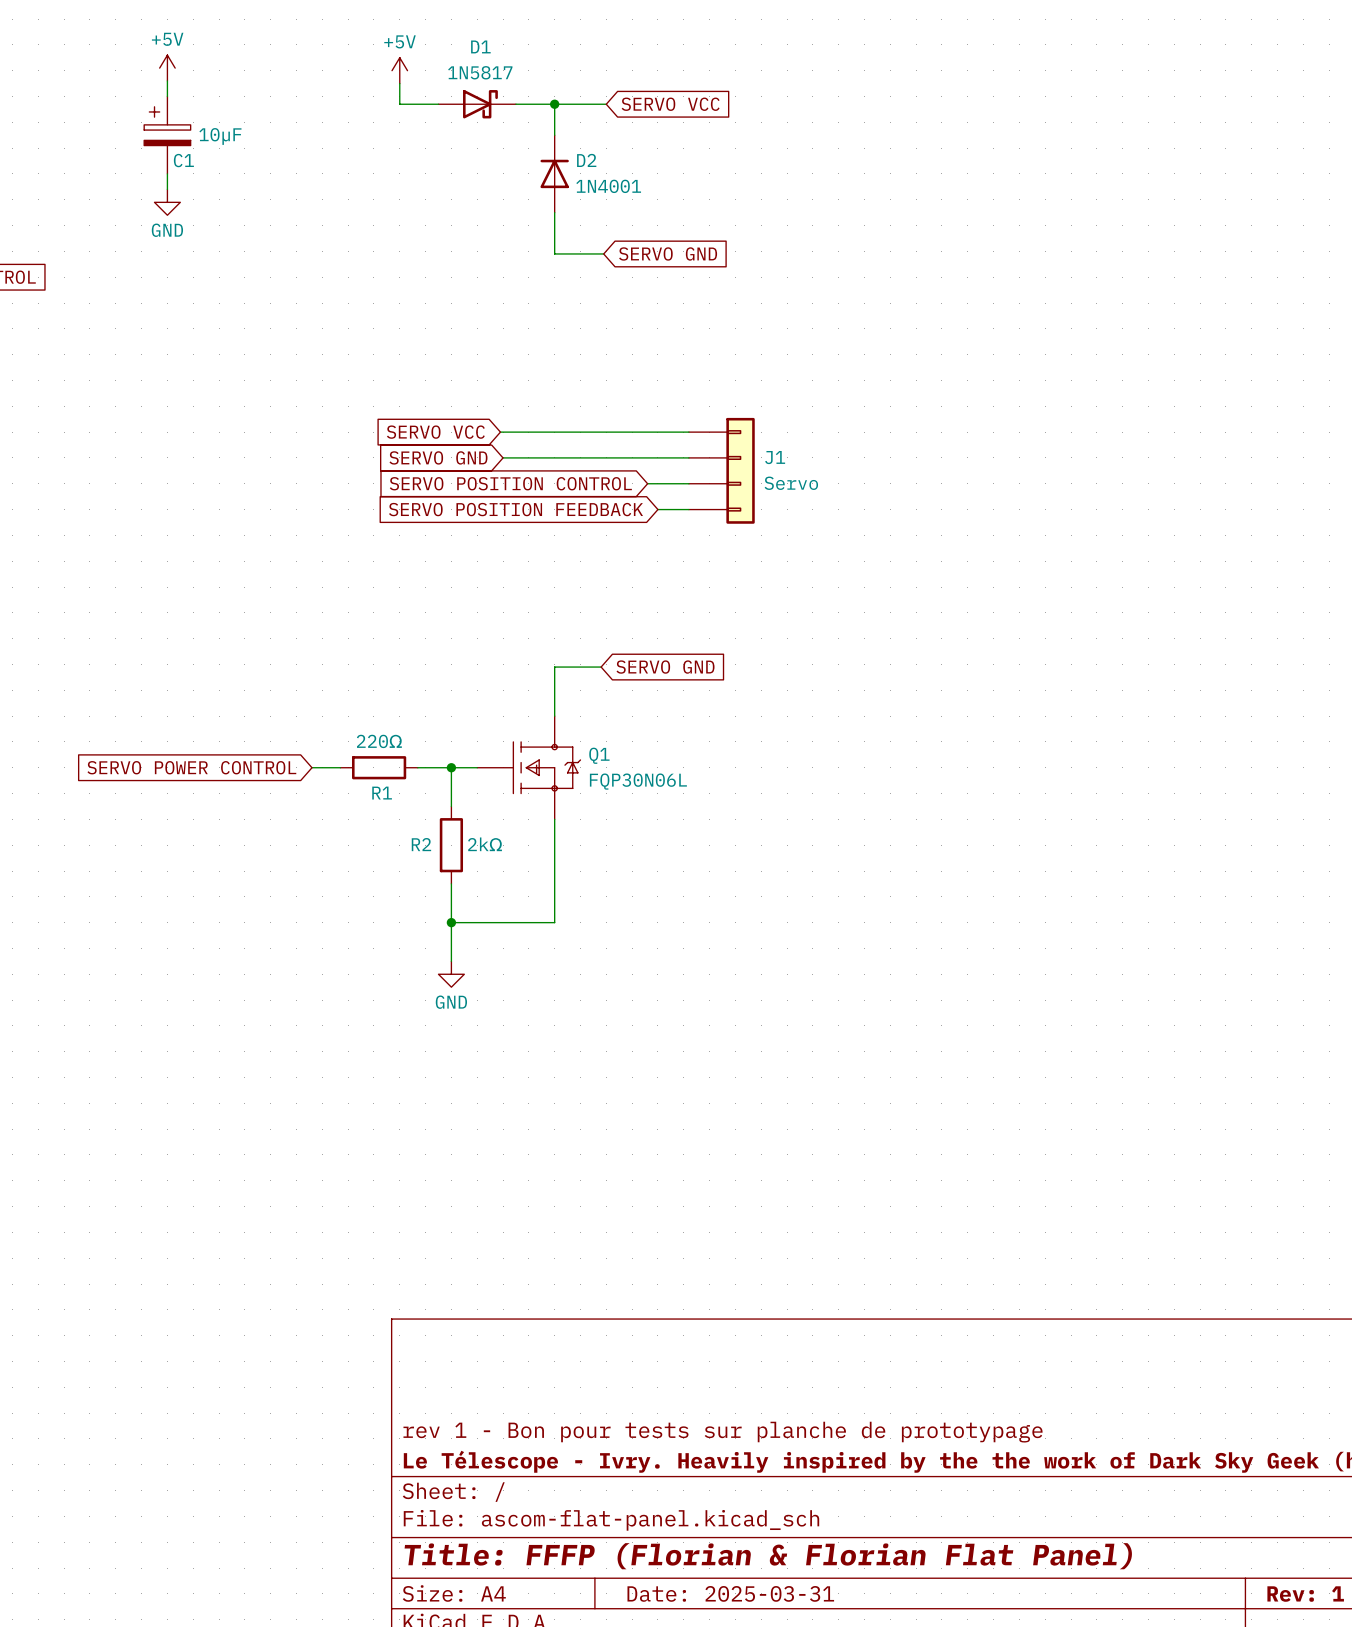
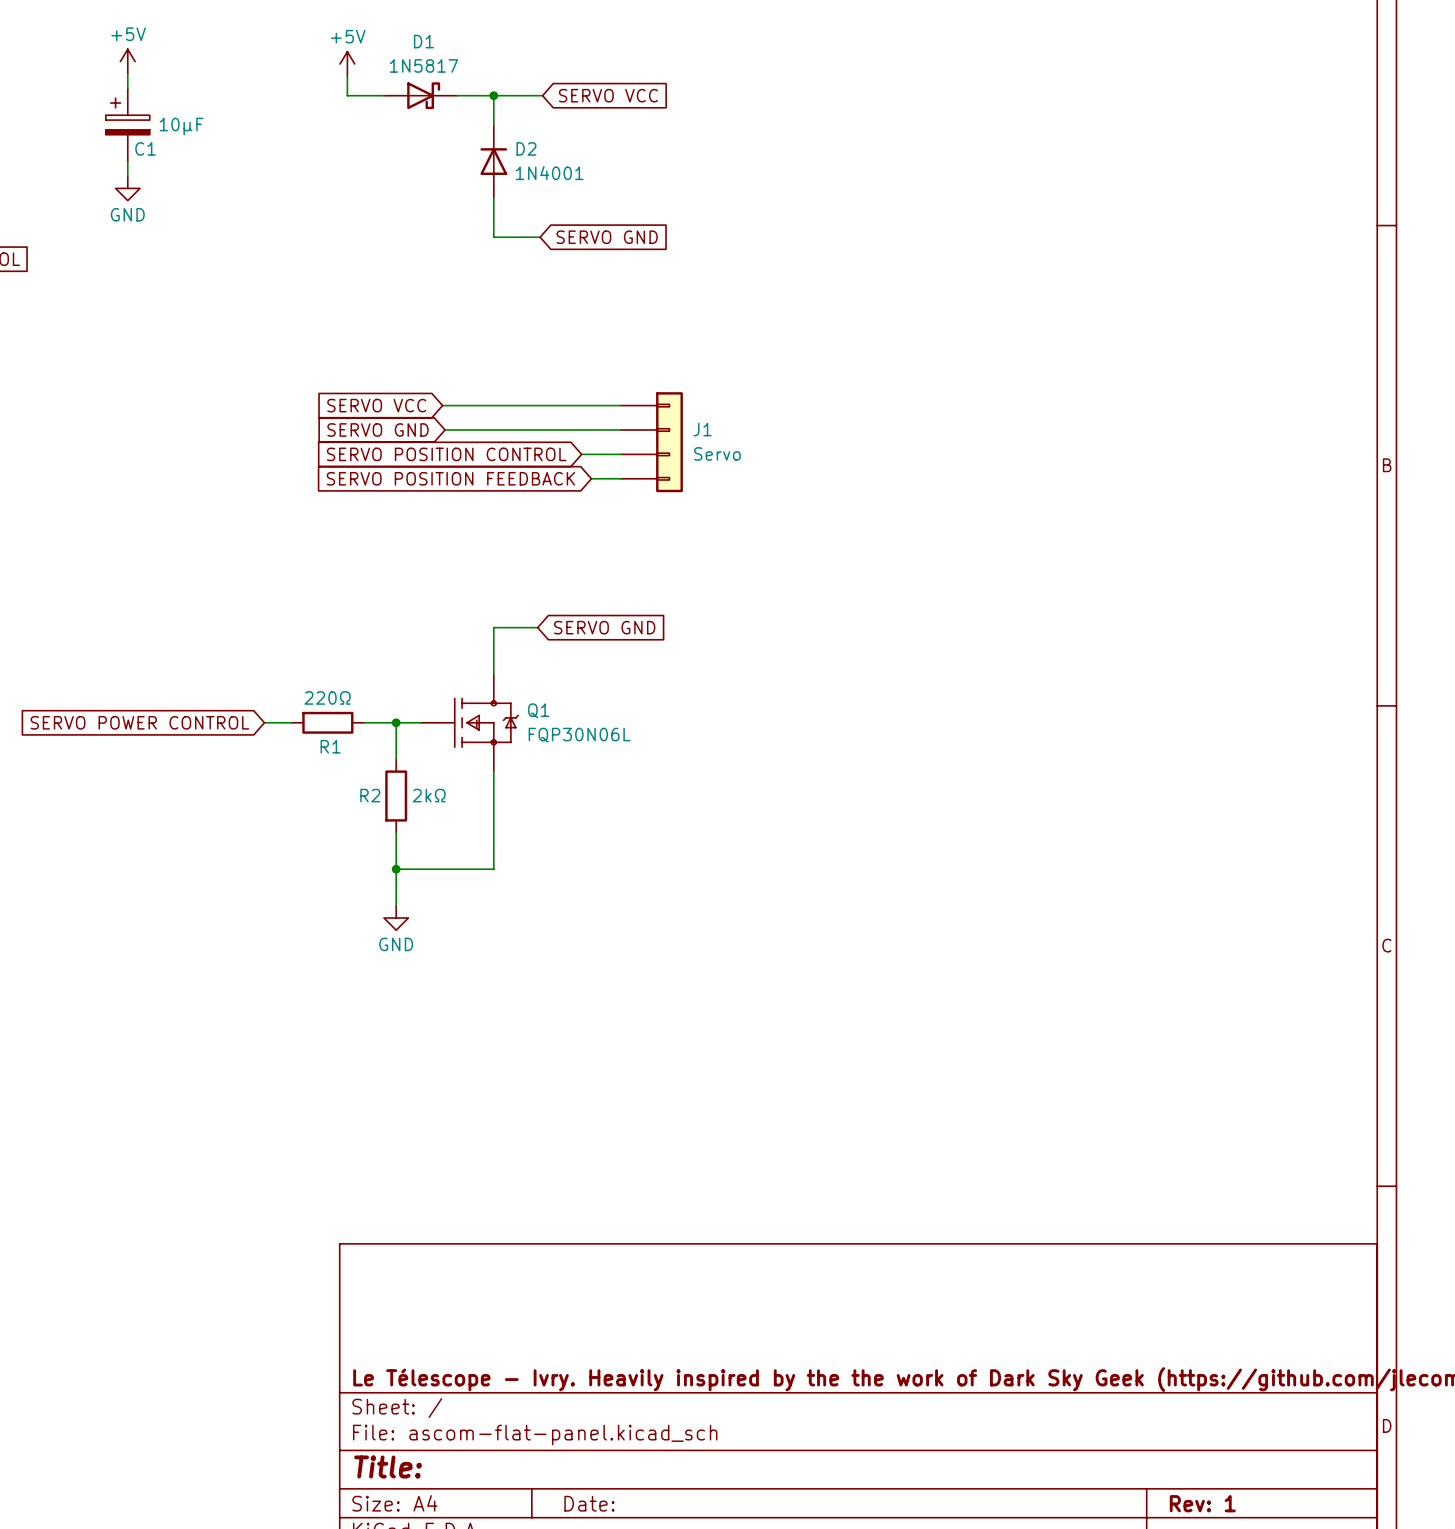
title block: rev 1 - Bon pour tests sur planche de prototypage (723, 1432) -> none
title block: Title: FFFP (Florian & Florian Flat Panel) (768, 1556) -> Title: (388, 1467)
title block: Date: 2025-03-31 (730, 1593) -> Date: (589, 1503)

